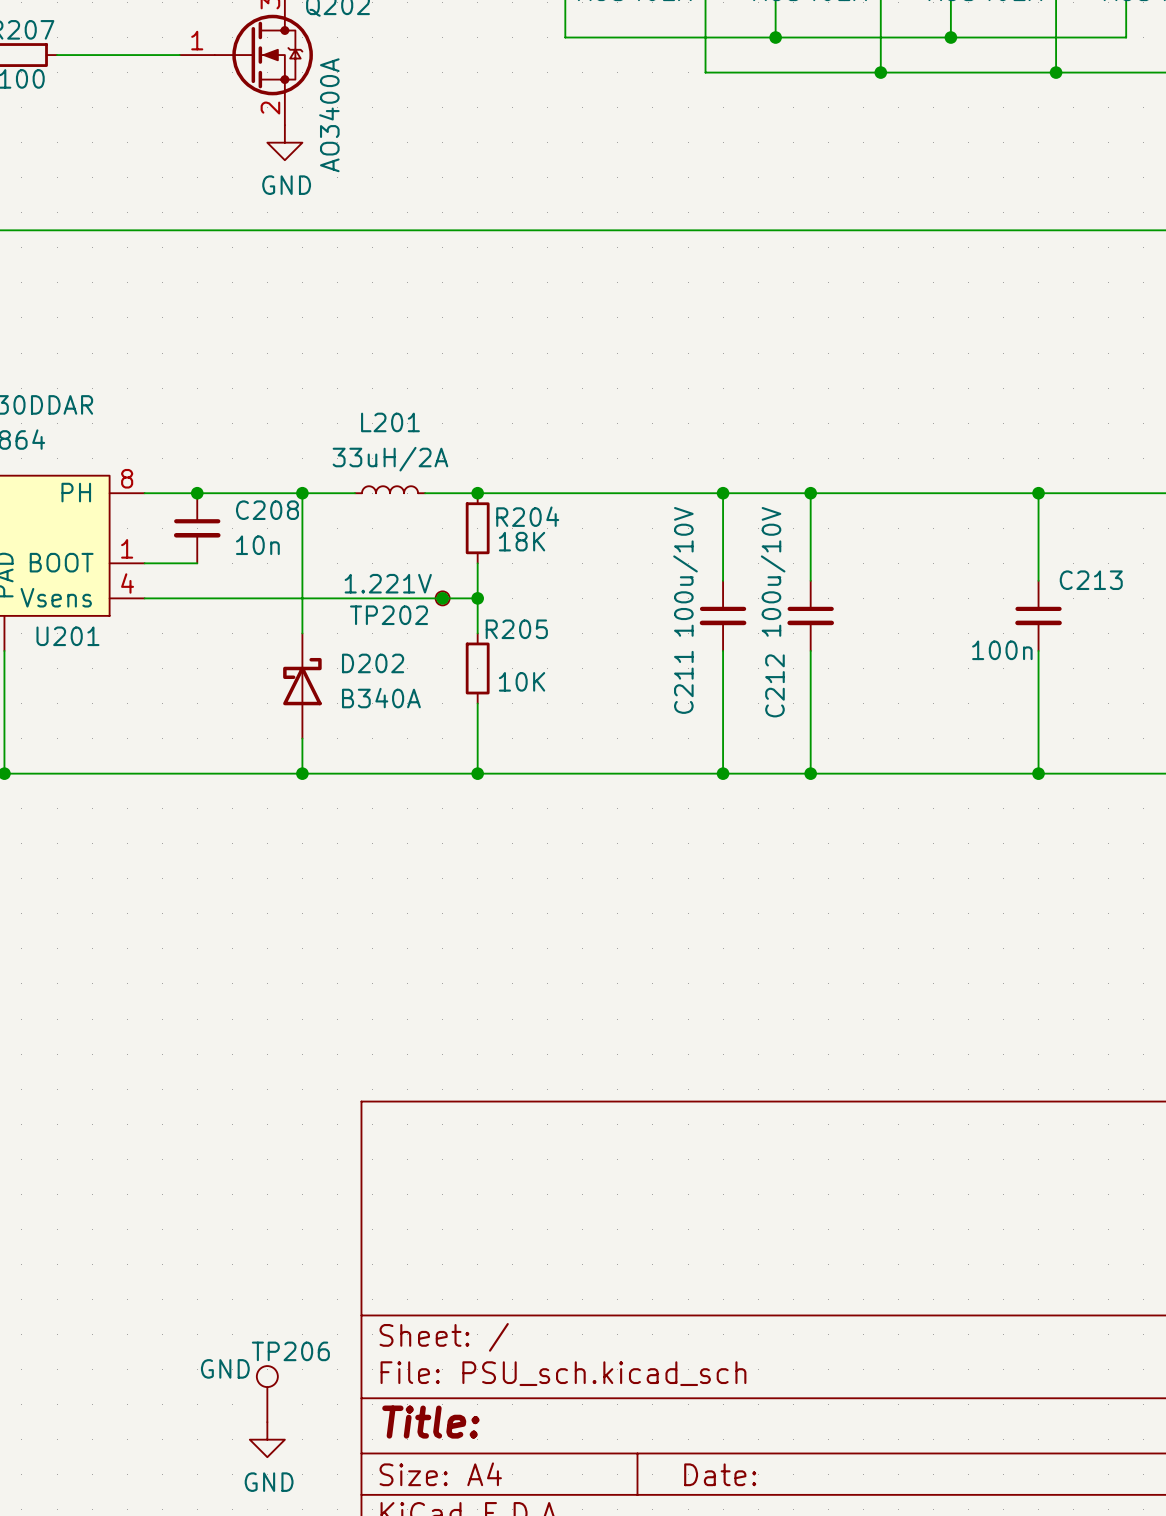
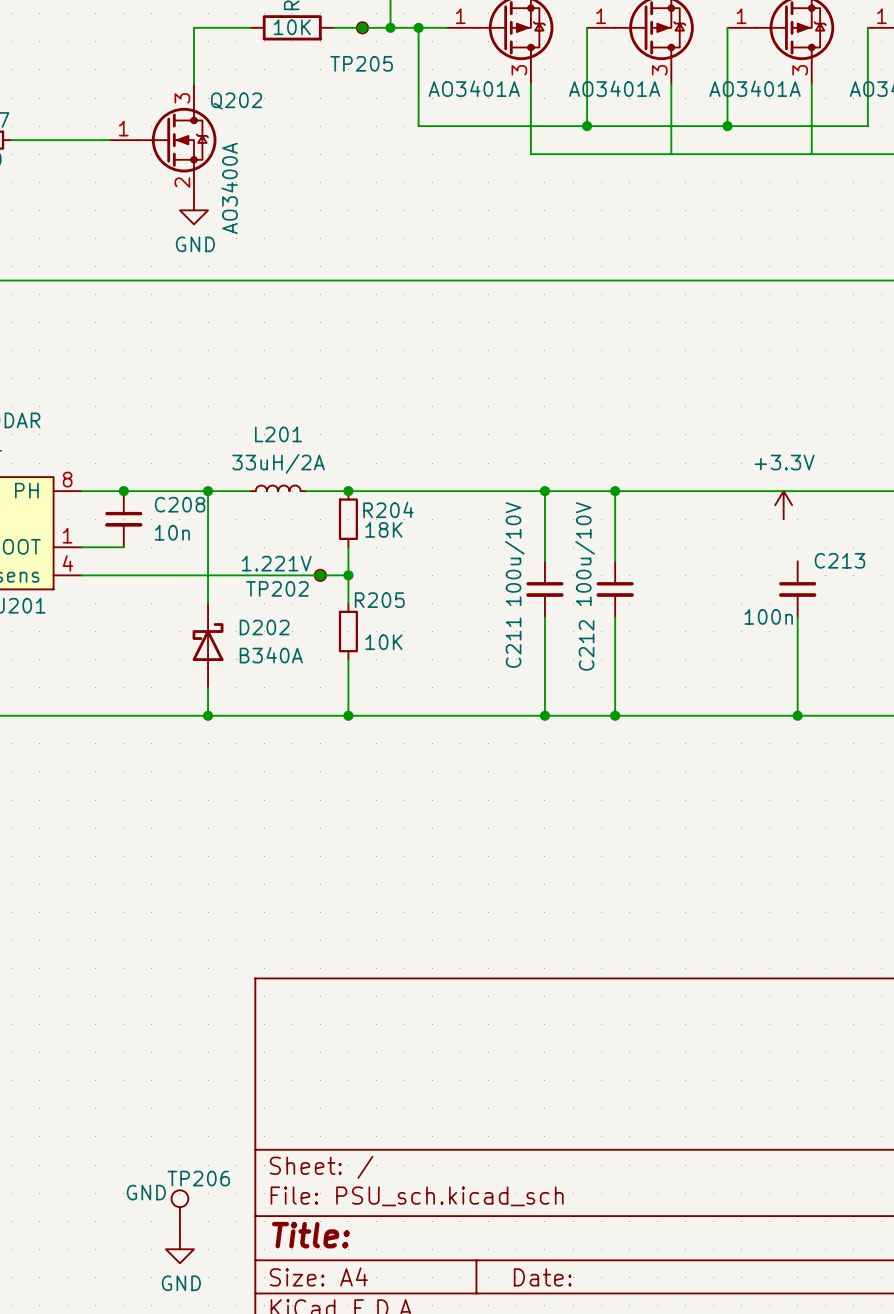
junction: (880, 72) -> none
junction: (1056, 72) -> none
wire: (1038, 493) (1038, 580) -> none
junction: (1038, 493) -> none
power symbol: none -> +3.3V (783, 505)

